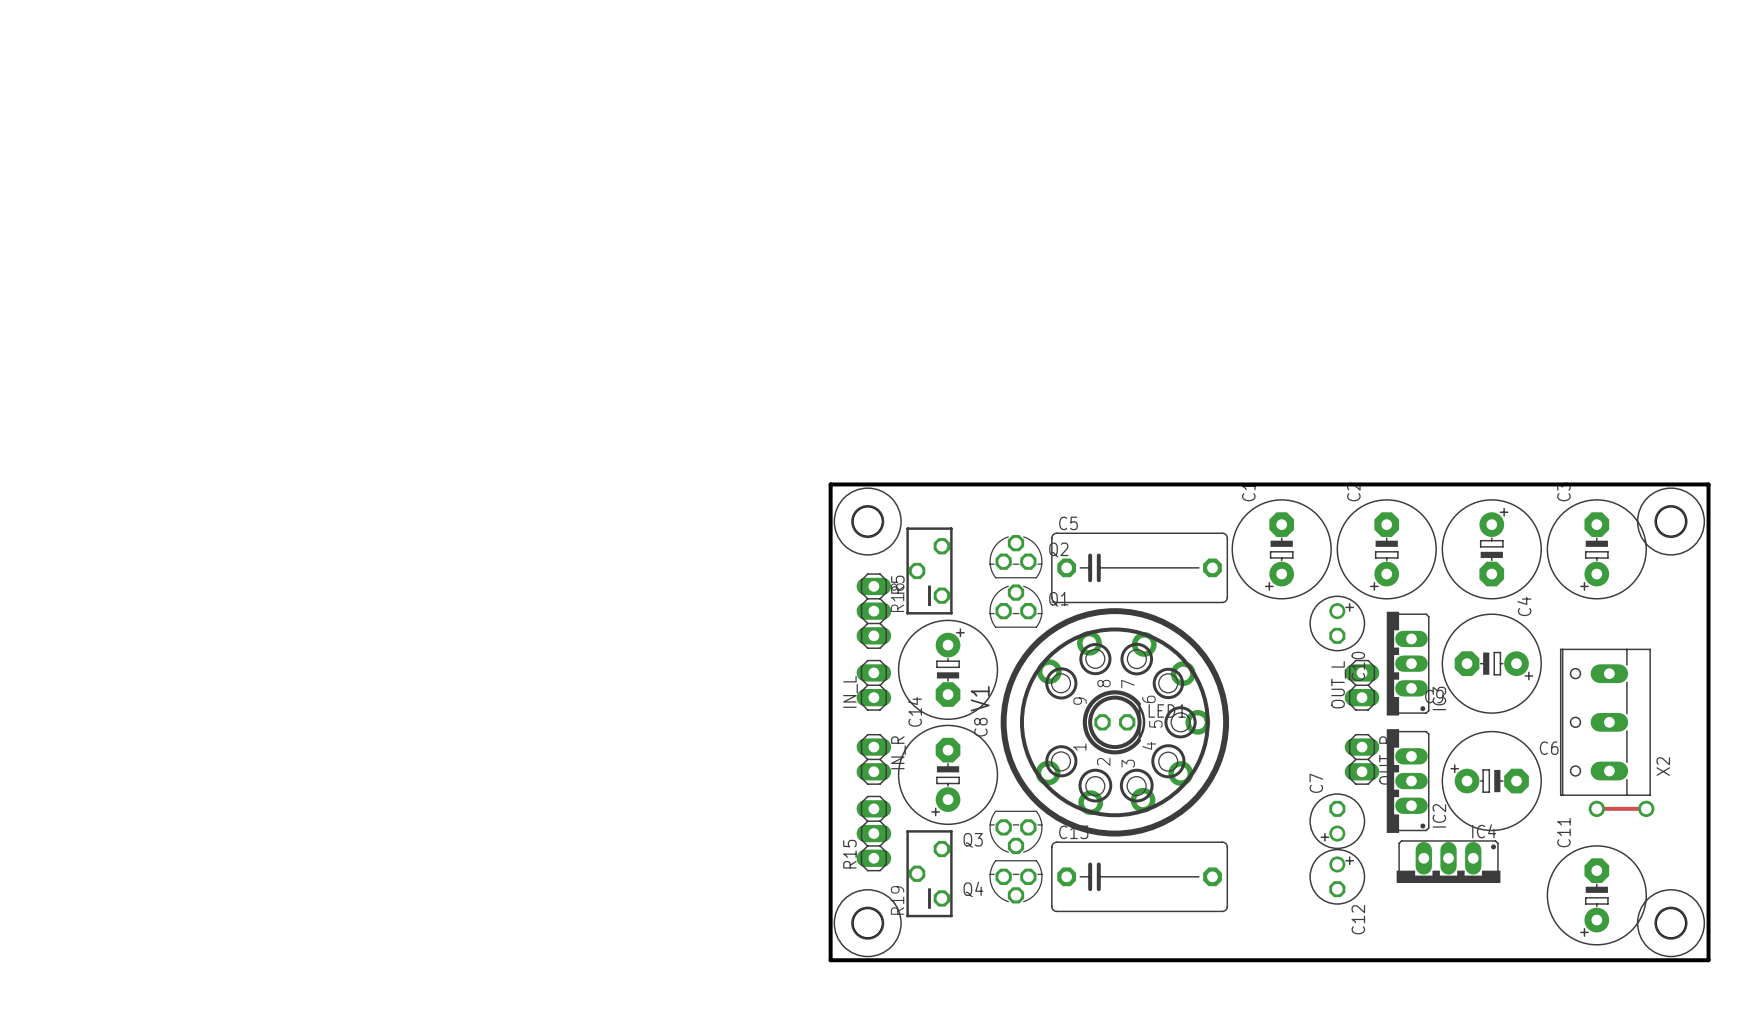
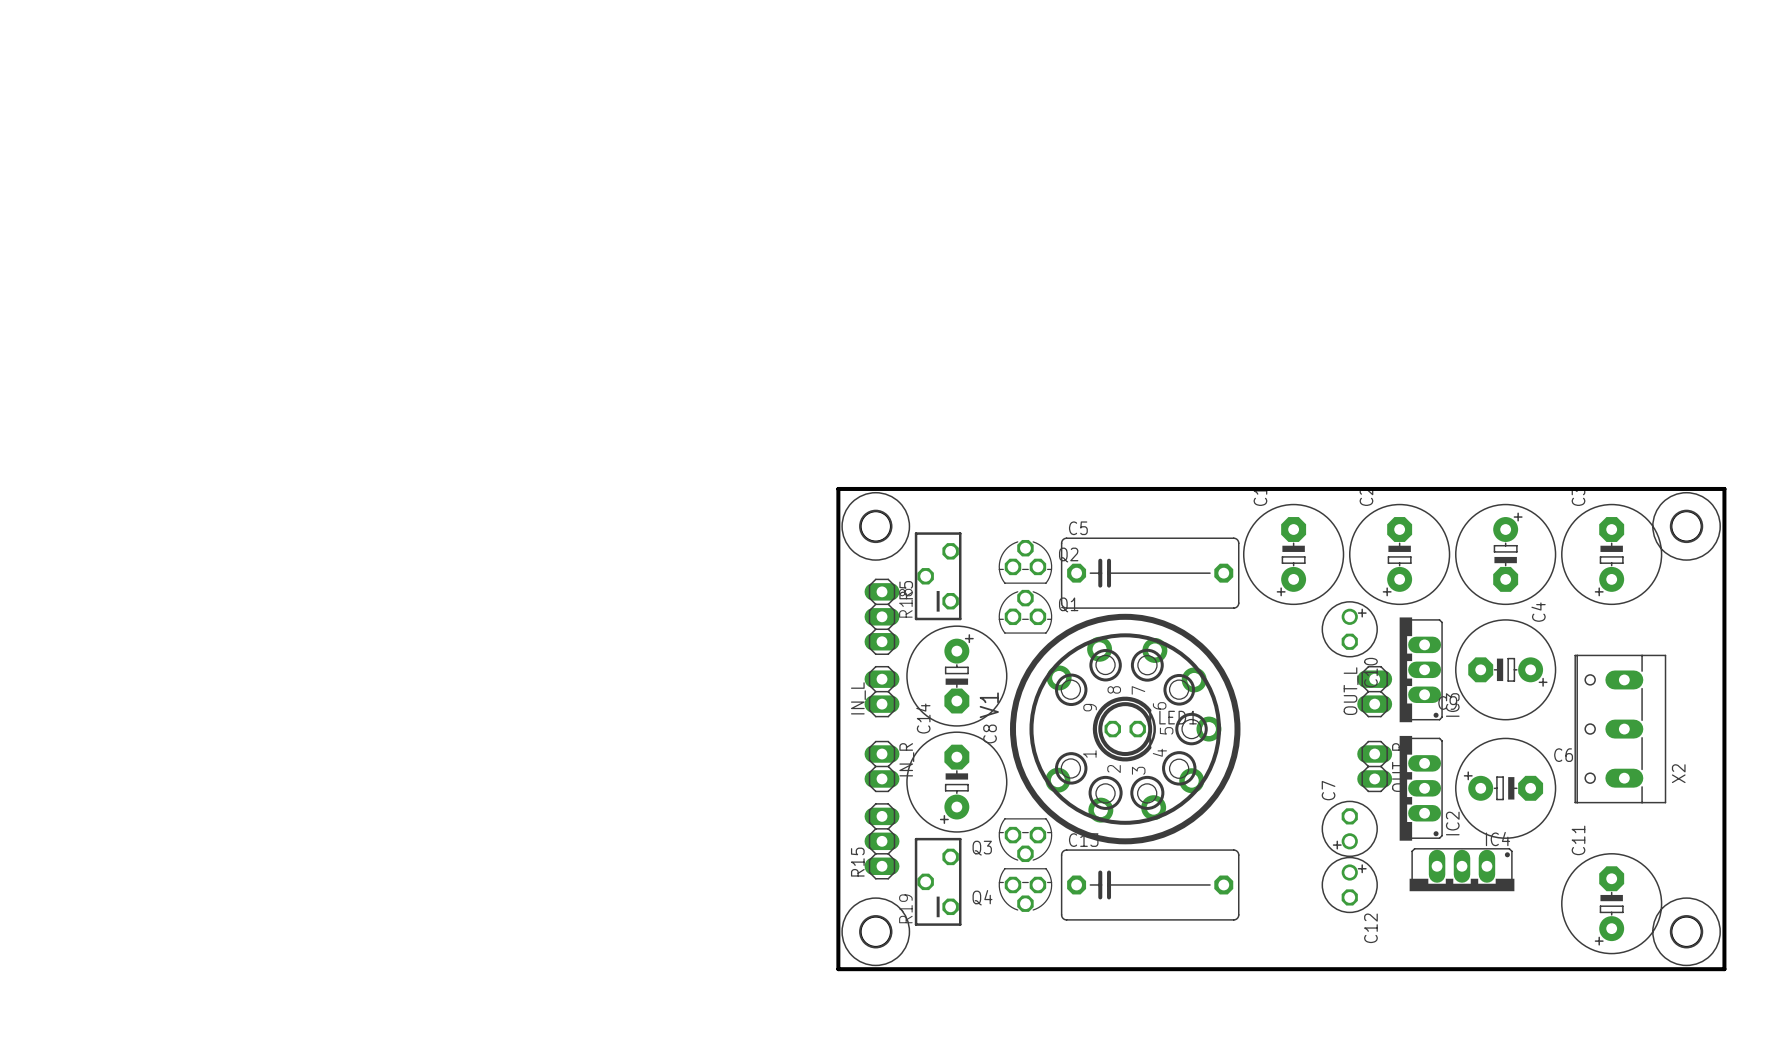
track: (1596, 808) (1646, 808) -> none
via: (1596, 808) -> none
via: (1646, 808) -> none

